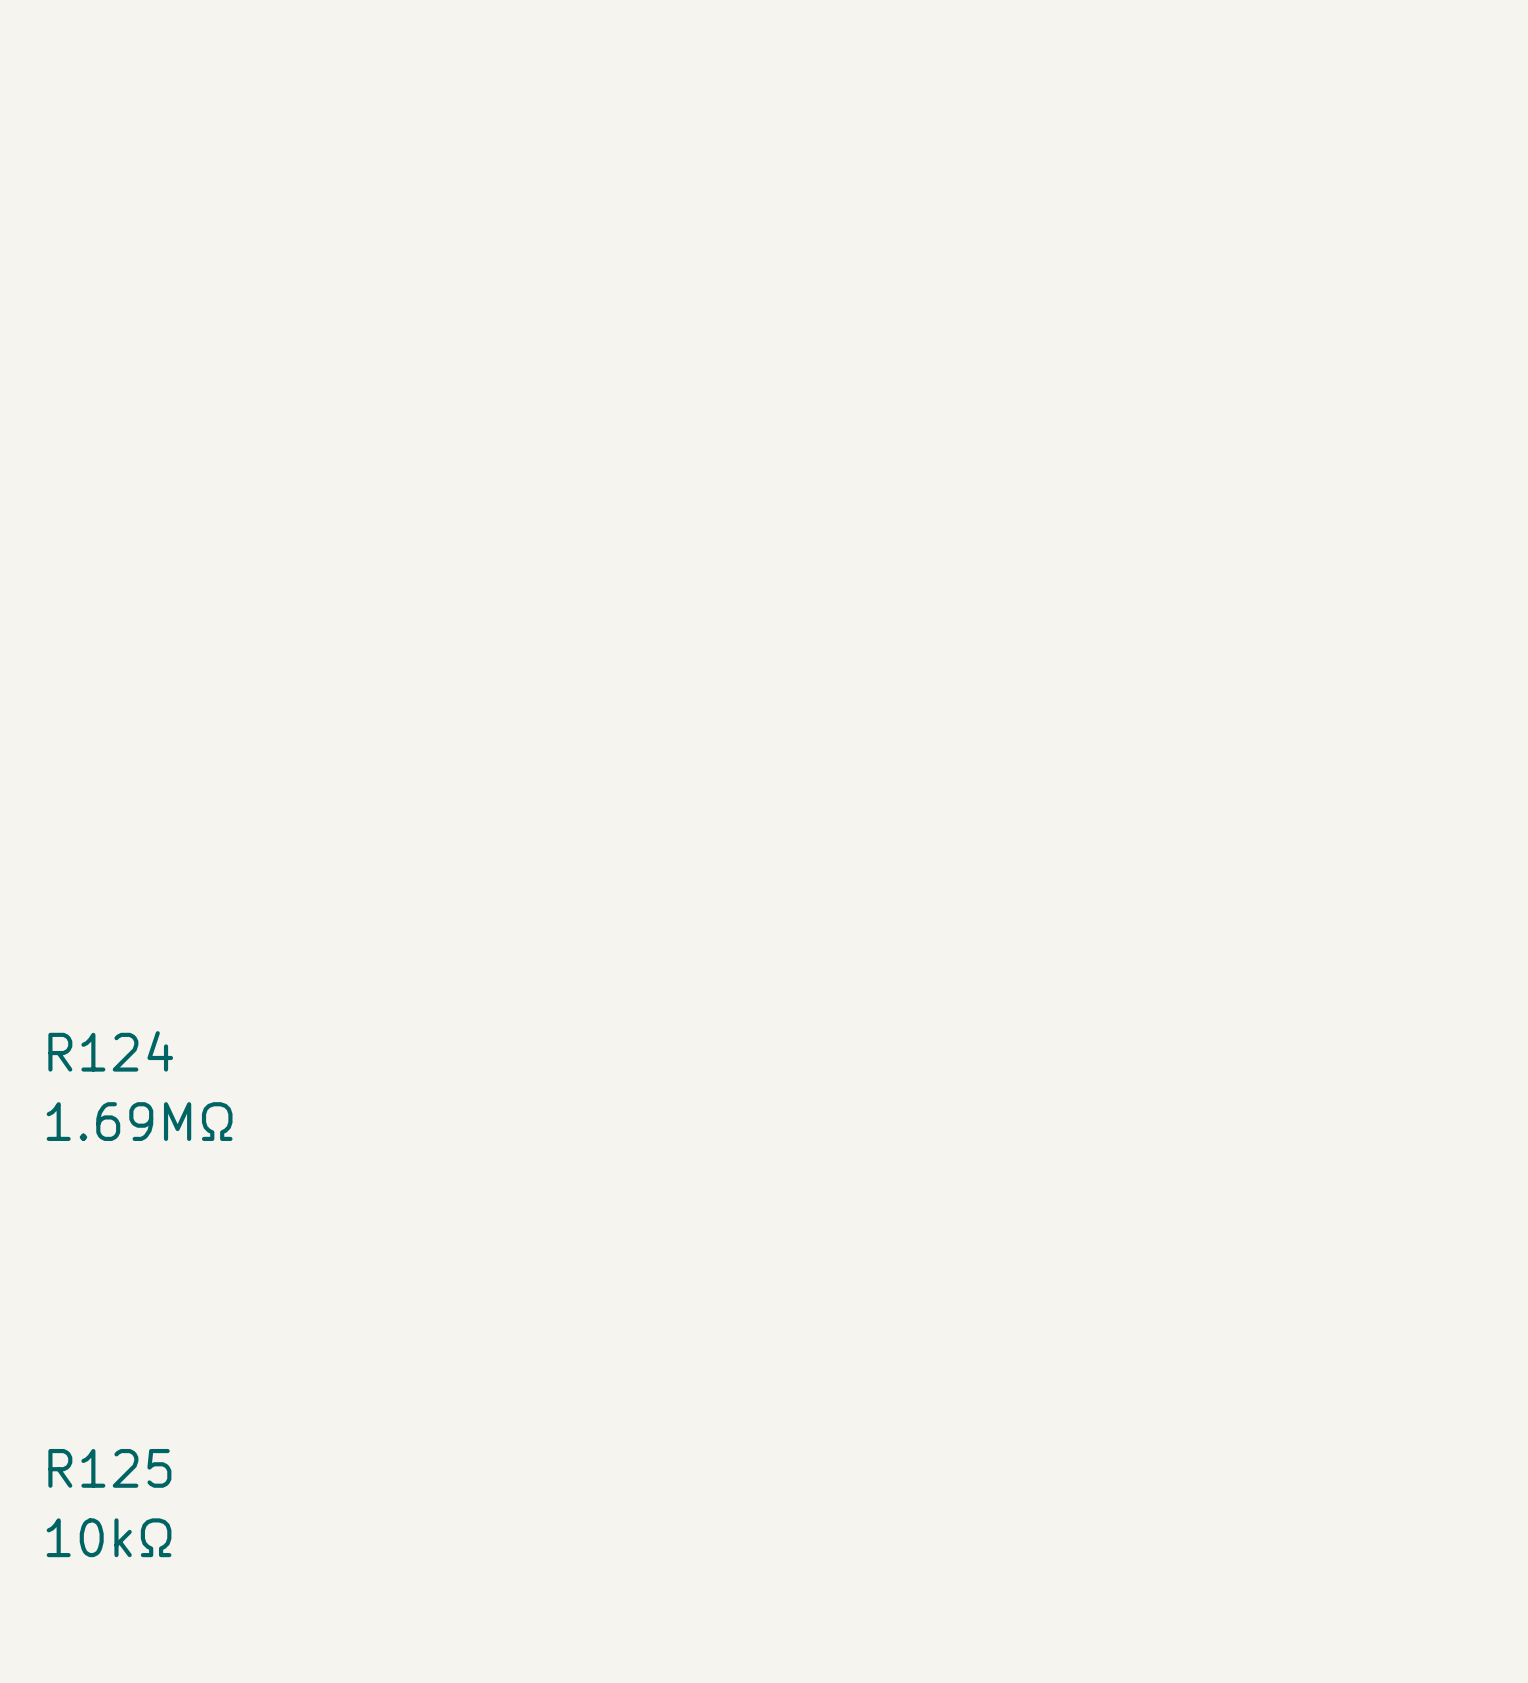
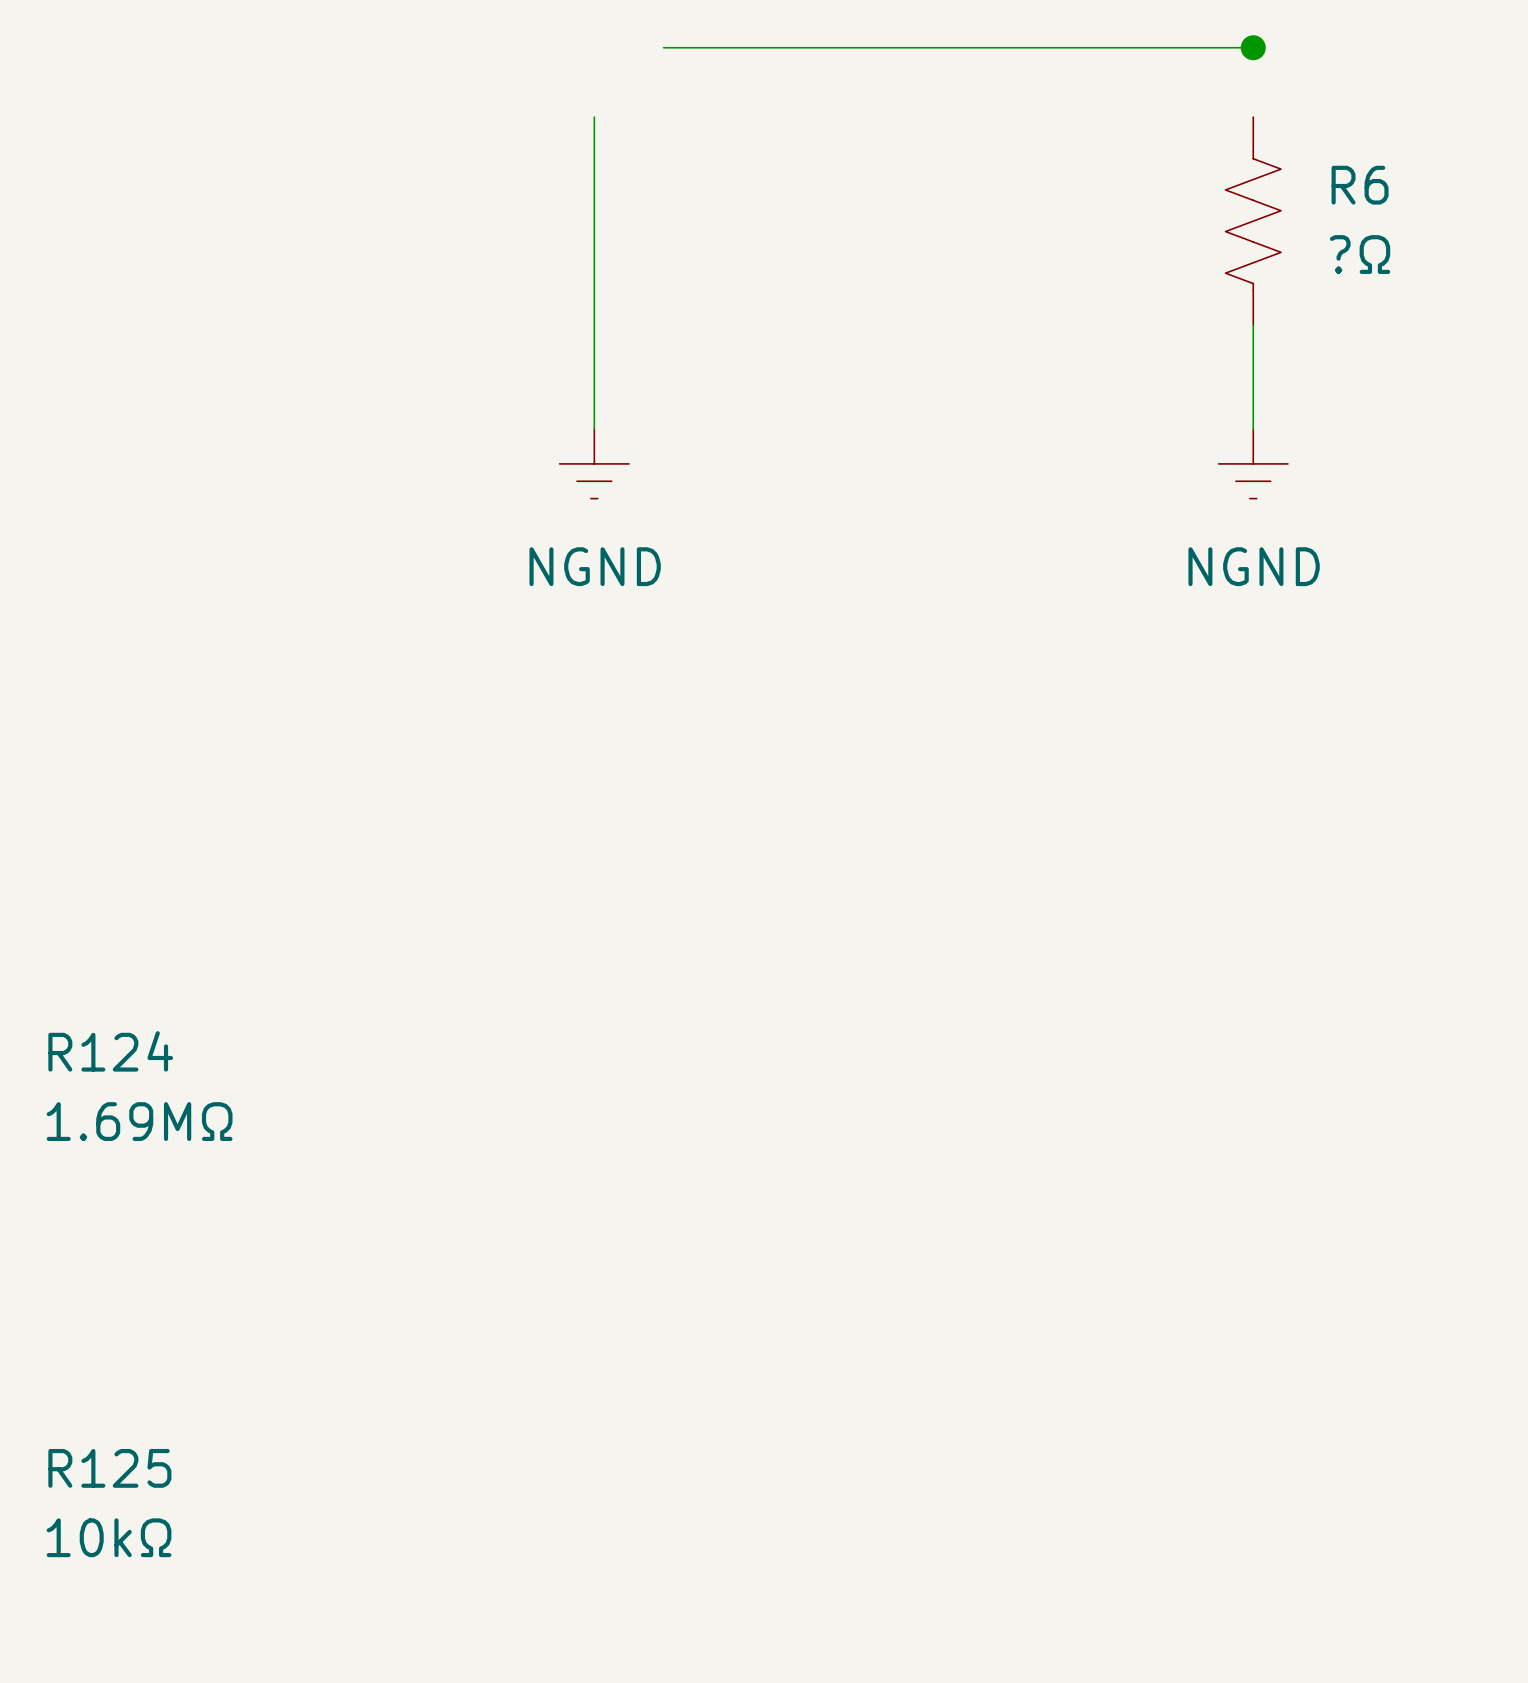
wire: none -> (663, 47) (1253, 47)
junction: none -> (1253, 47)
wire: none -> (594, 117) (594, 429)
R6: none -> ?Ω (1253, 221)
wire: none -> (1253, 325) (1253, 429)
power symbol: none -> NGND (594, 463)
power symbol: none -> NGND (1253, 463)

